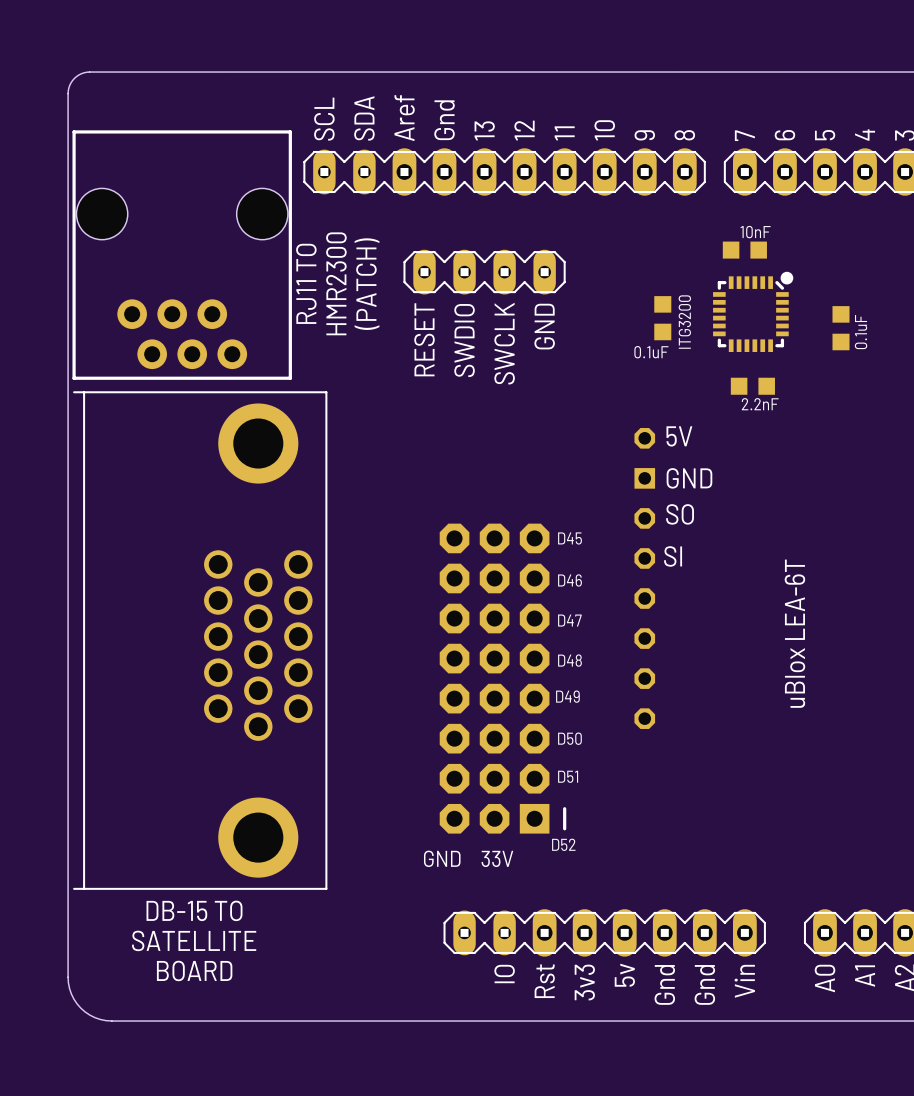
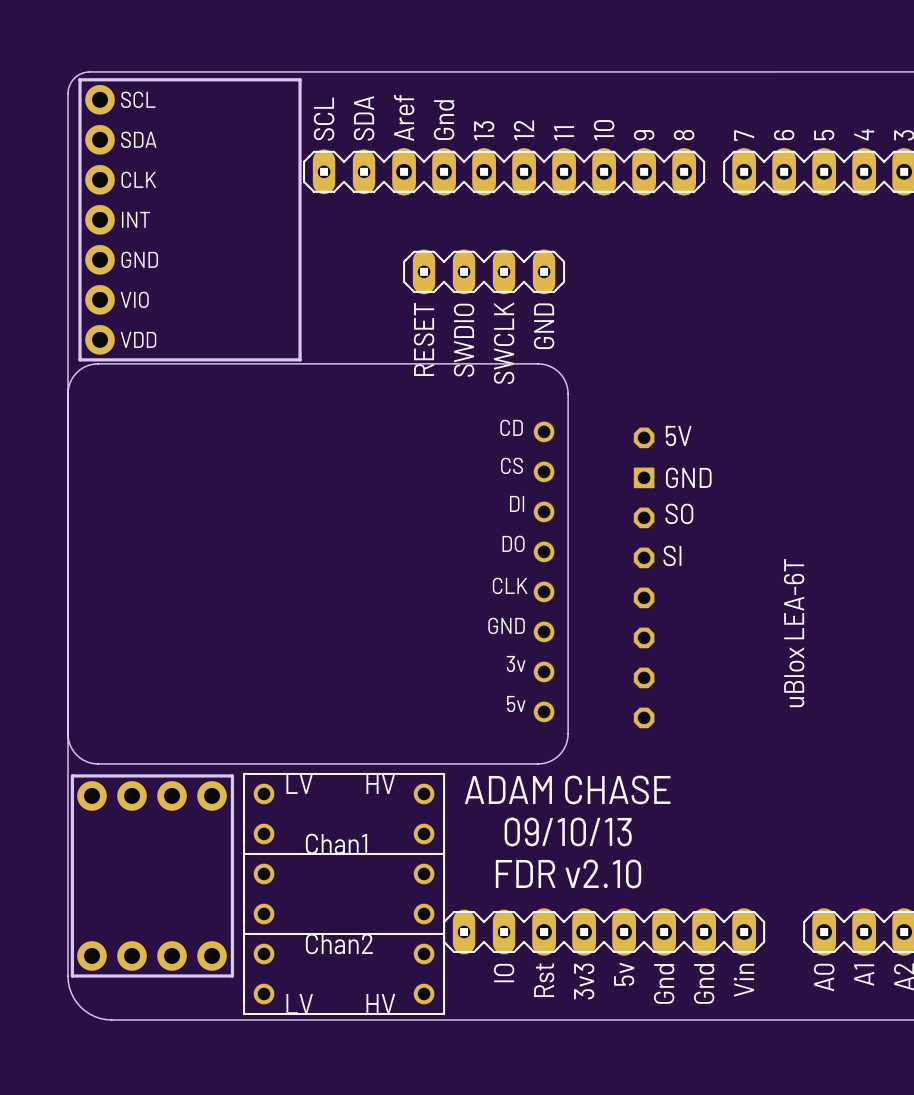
part: none -> (190, 219)
text: 10nF (755, 232) -> none
part: (744, 250) -> none
part: (182, 255) -> none
drawing: [780, 271, 794, 285] -> none
text: RJ11 TO (306, 283) -> none
text: HMR2300 (336, 283) -> none
text: (PATCH) (367, 284) -> none
part: (750, 314) -> none
part: (662, 318) -> none
text: ITG3200 (684, 322) -> none
part: (841, 328) -> none
text: 0.1uF (861, 332) -> none
text: 0.1uF (651, 352) -> none
part: (752, 386) -> none
text: 2.2nF (760, 404) -> none
text: D45 (570, 538) -> none
part: none -> (318, 563)
text: D46 (570, 580) -> none
text: D47 (569, 620) -> none
part: (200, 640) -> none
text: D48 (569, 660) -> none
part: (502, 678) -> none
text: D49 (567, 696) -> none
text: D50 (569, 738) -> none
text: D51 (568, 776) -> ADAM CHASE (567, 789)
text: none -> 09/10/13 (568, 831)
text: D52 (563, 844) -> none
text: GND (442, 858) -> none
text: 33V (497, 858) -> none
text: none -> FDR v2.10 (568, 873)
part: none -> (152, 875)
part: none -> (344, 893)
text: DB-15 TO (194, 910) -> none
text: SATELLITE (194, 940) -> none
text: BOARD (194, 970) -> none

